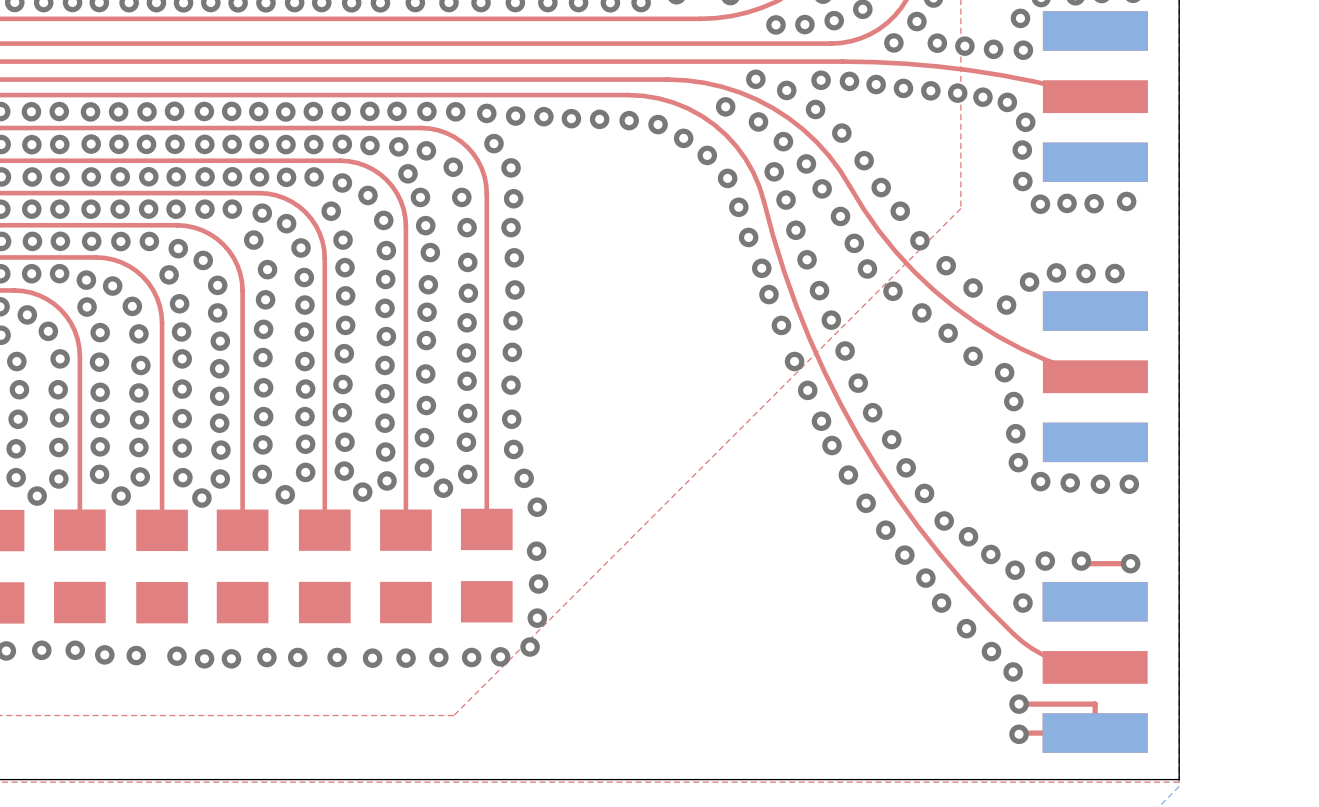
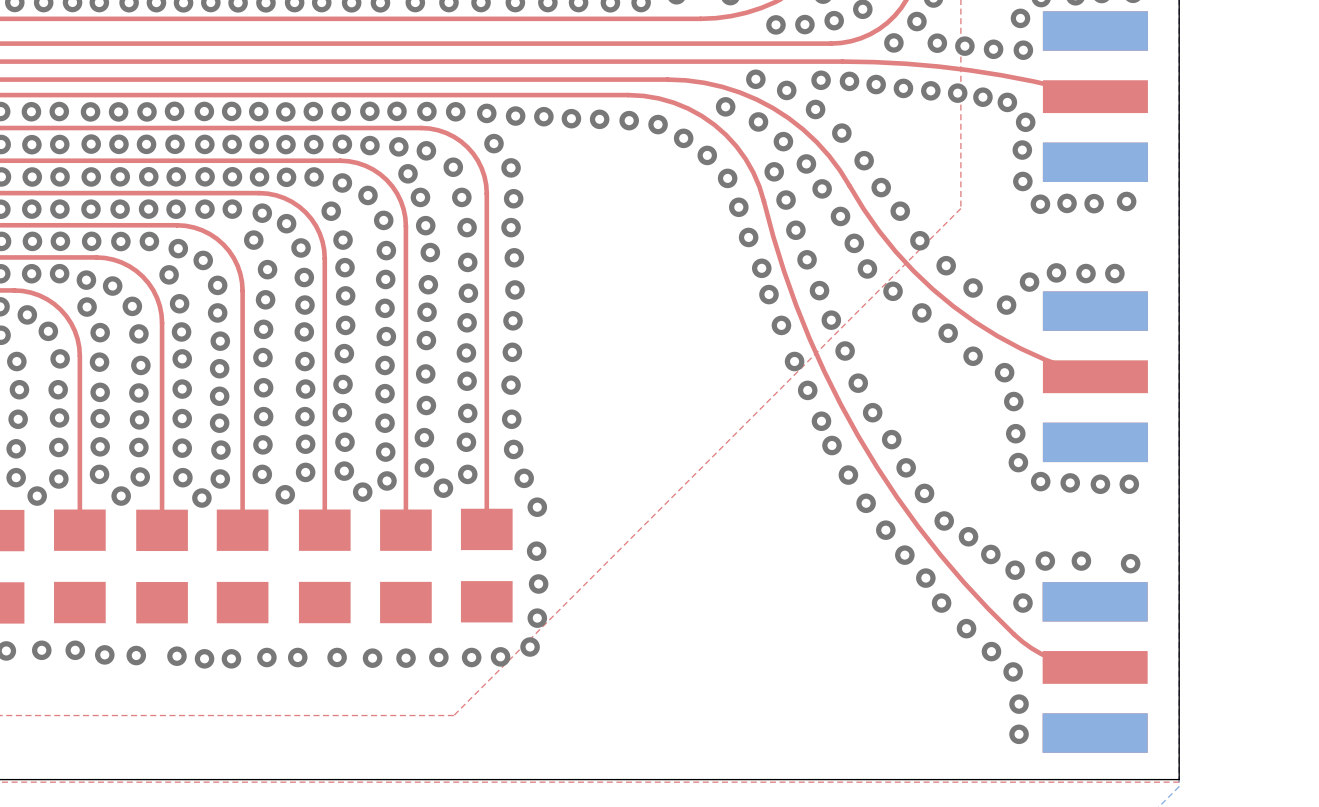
top track: (1081, 561) (1081, 563) (1130, 563) -> none
top track: (1019, 704) (1095, 704) (1095, 733) (1019, 734) -> none

